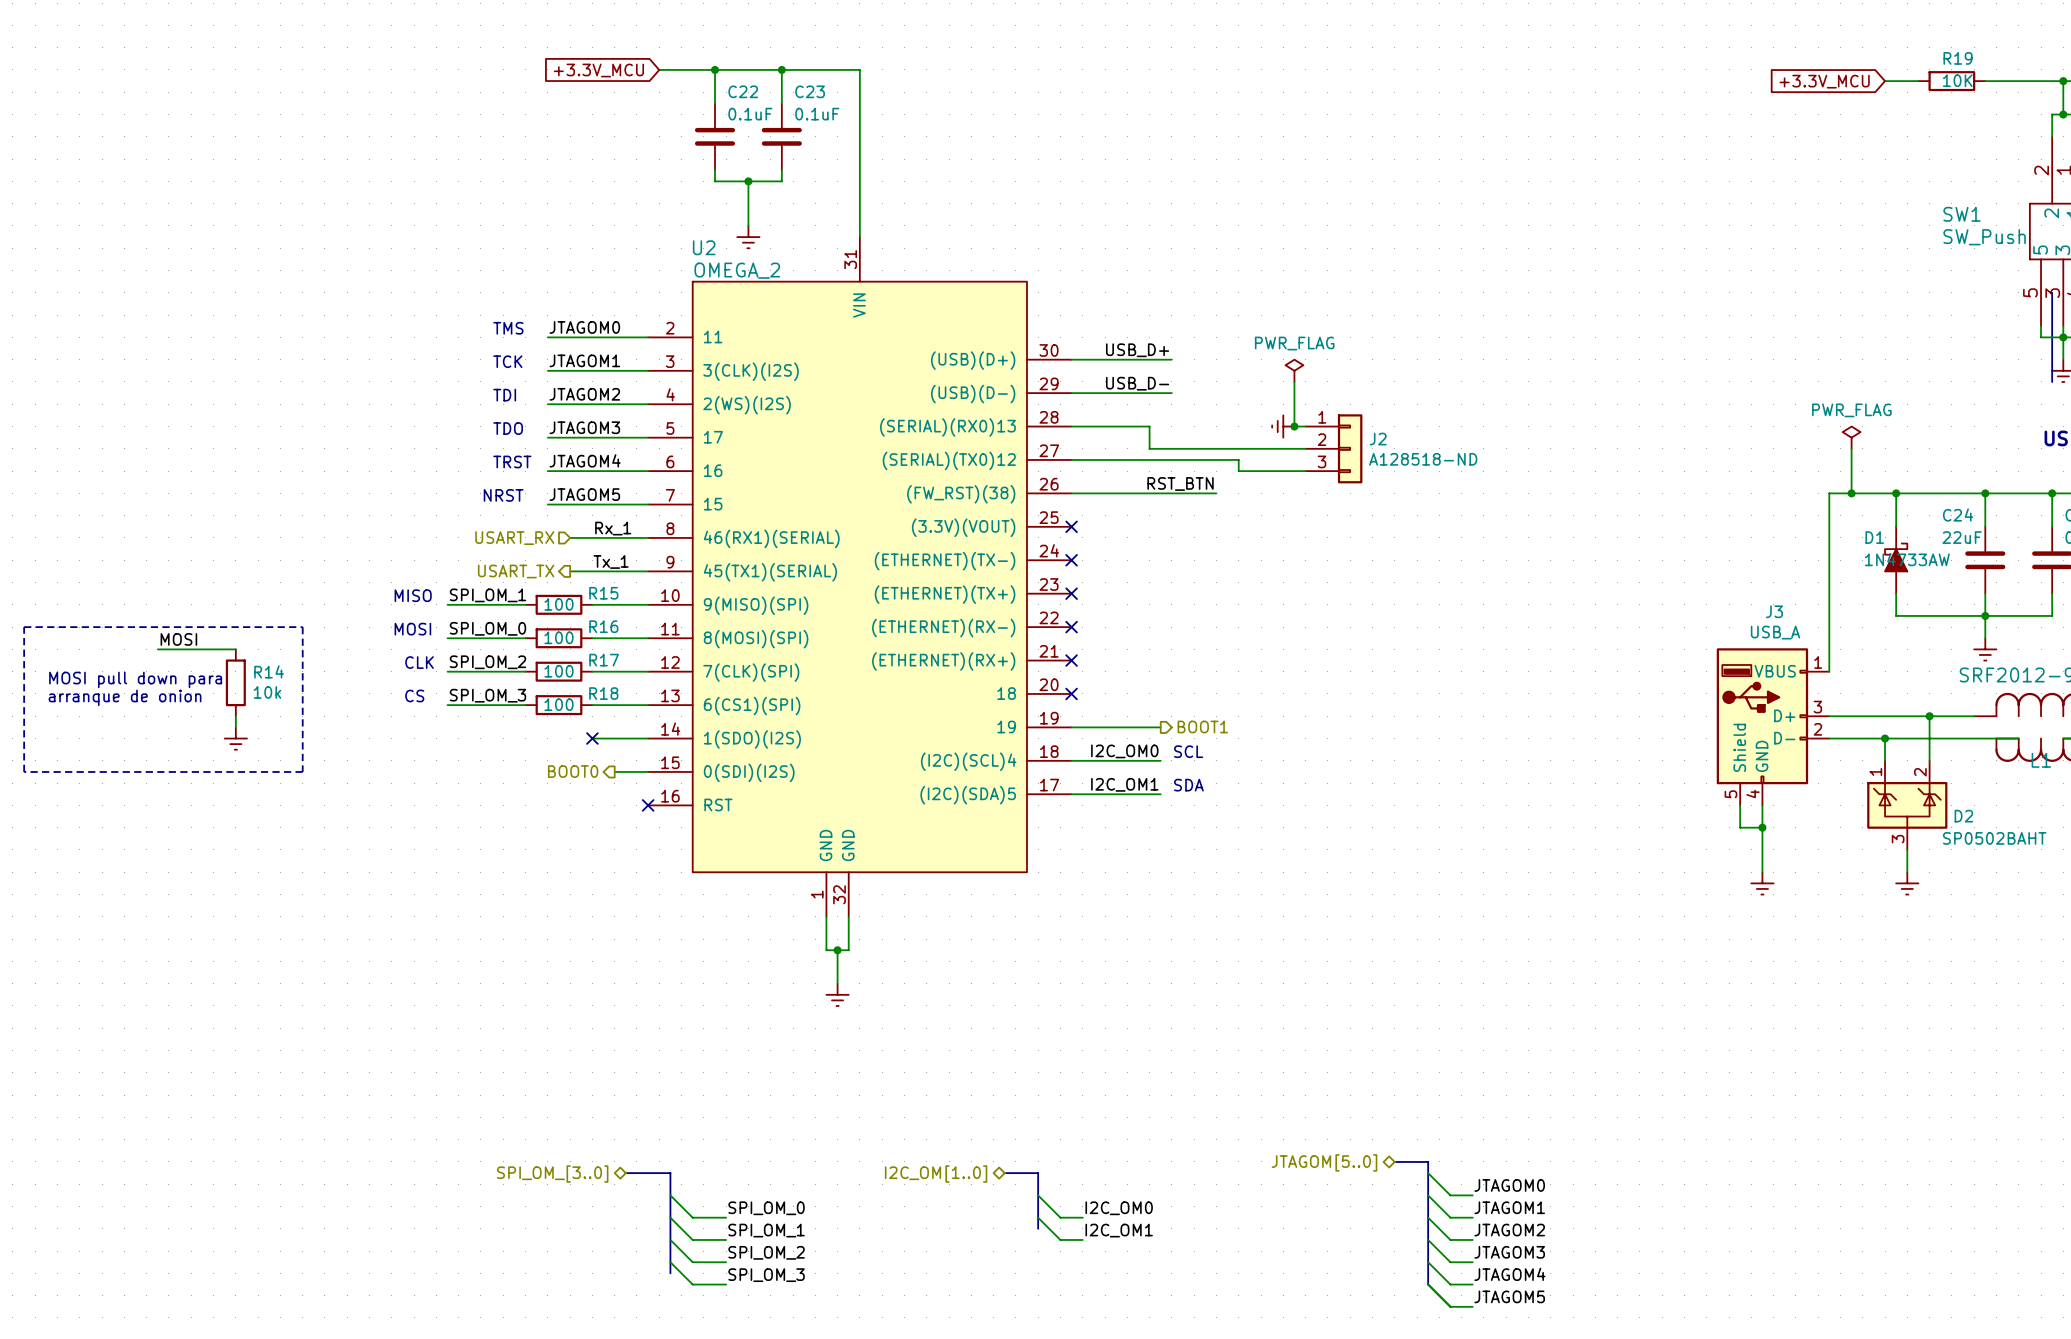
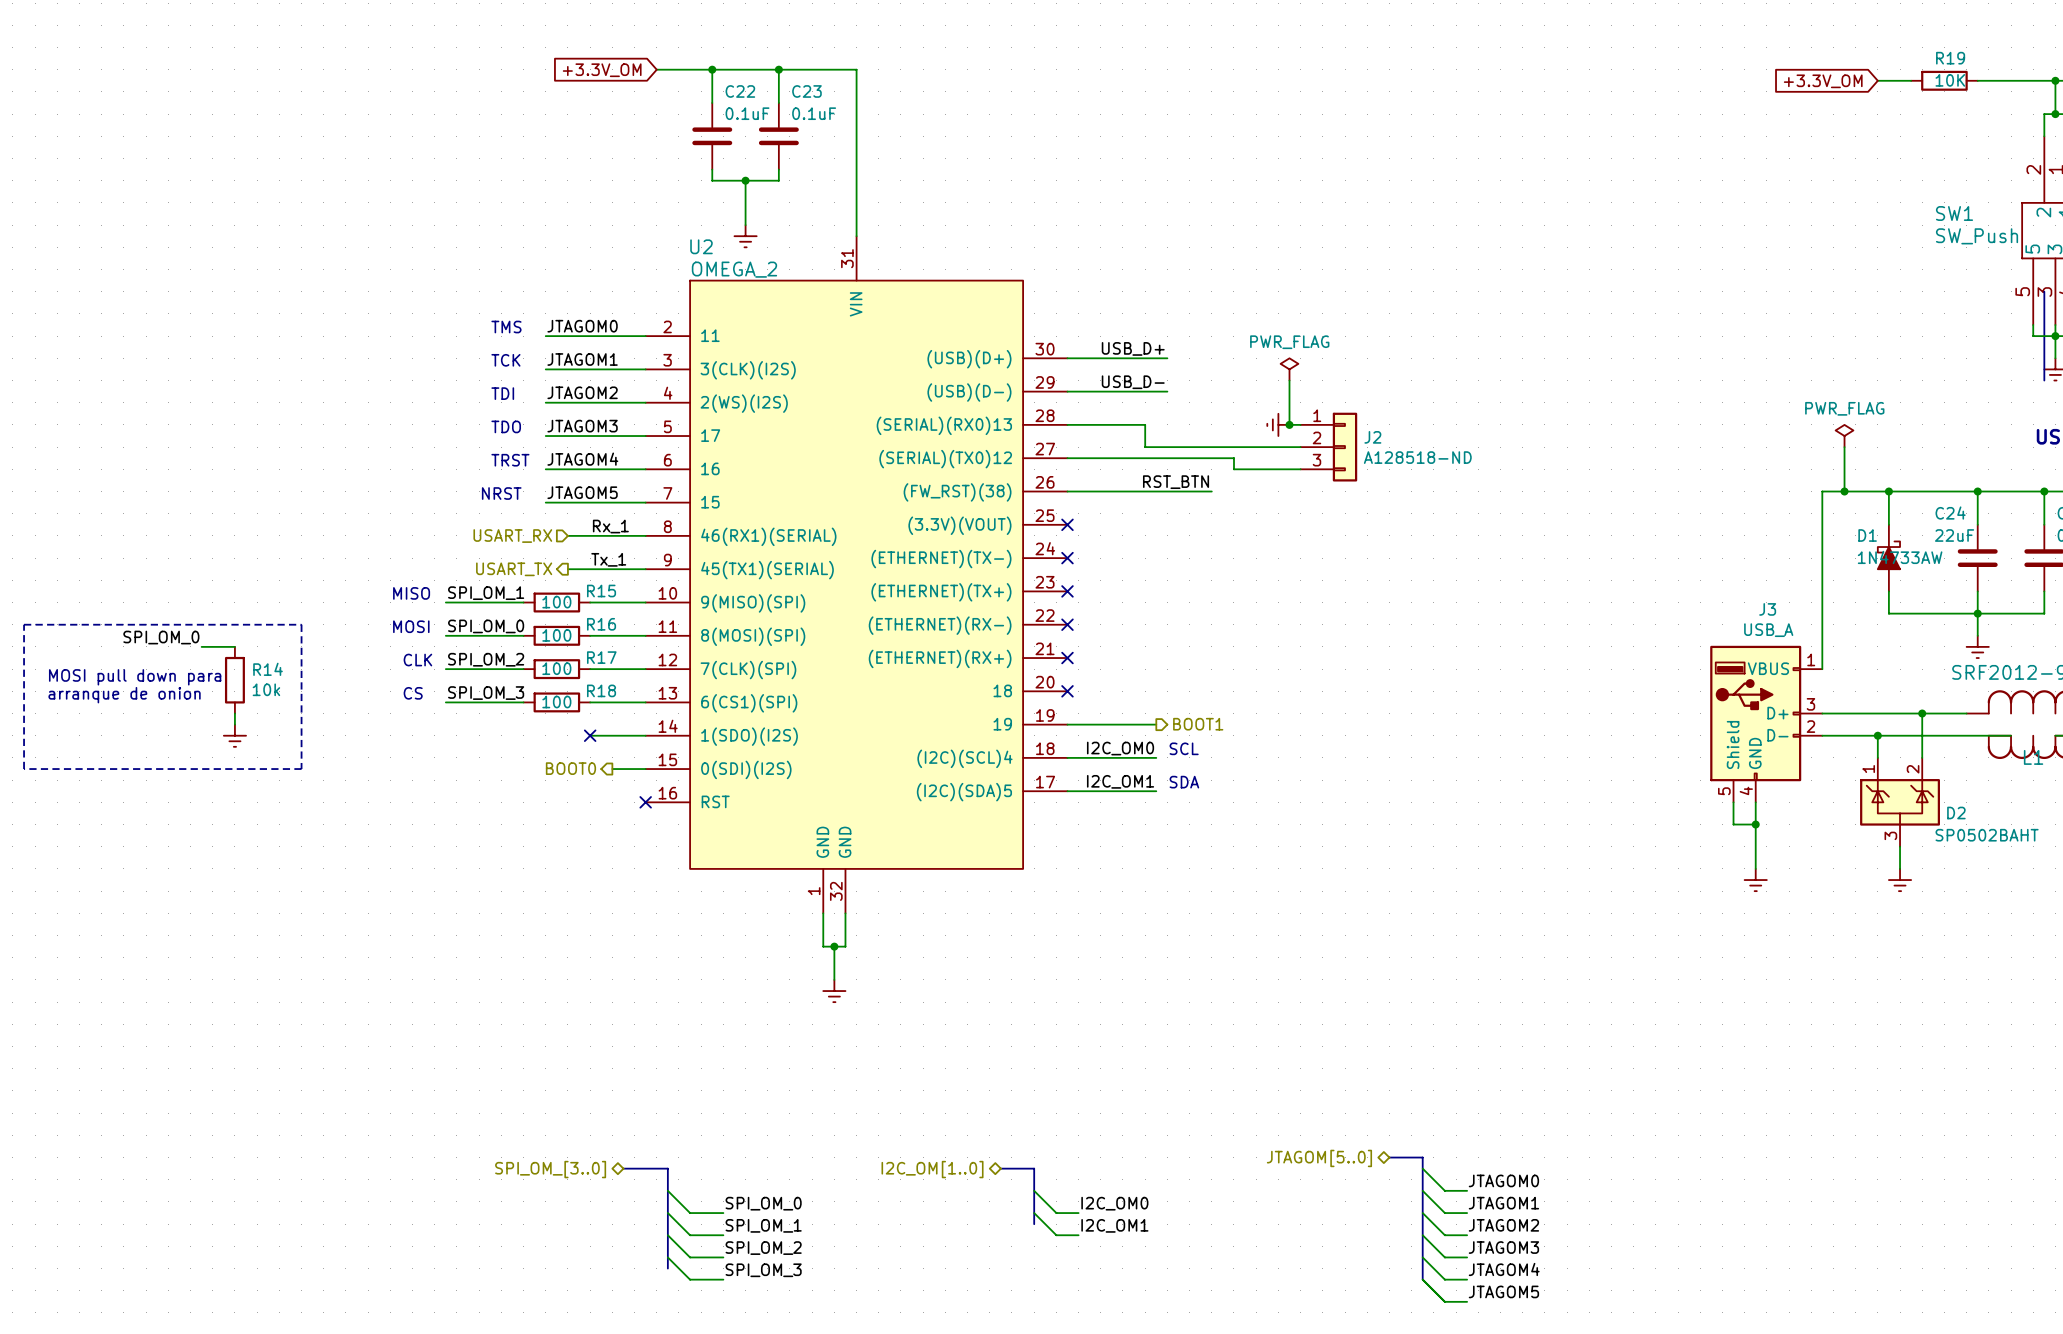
global label: +3.3V_MCU (598, 70) -> +3.3V_OM (602, 70)
global label: +3.3V_MCU (1824, 81) -> +3.3V_OM (1823, 81)
label: none -> SPI_OM_0 (161, 637)
label: MOSI (178, 639) -> none
wire: (157, 649) (202, 649) -> none

